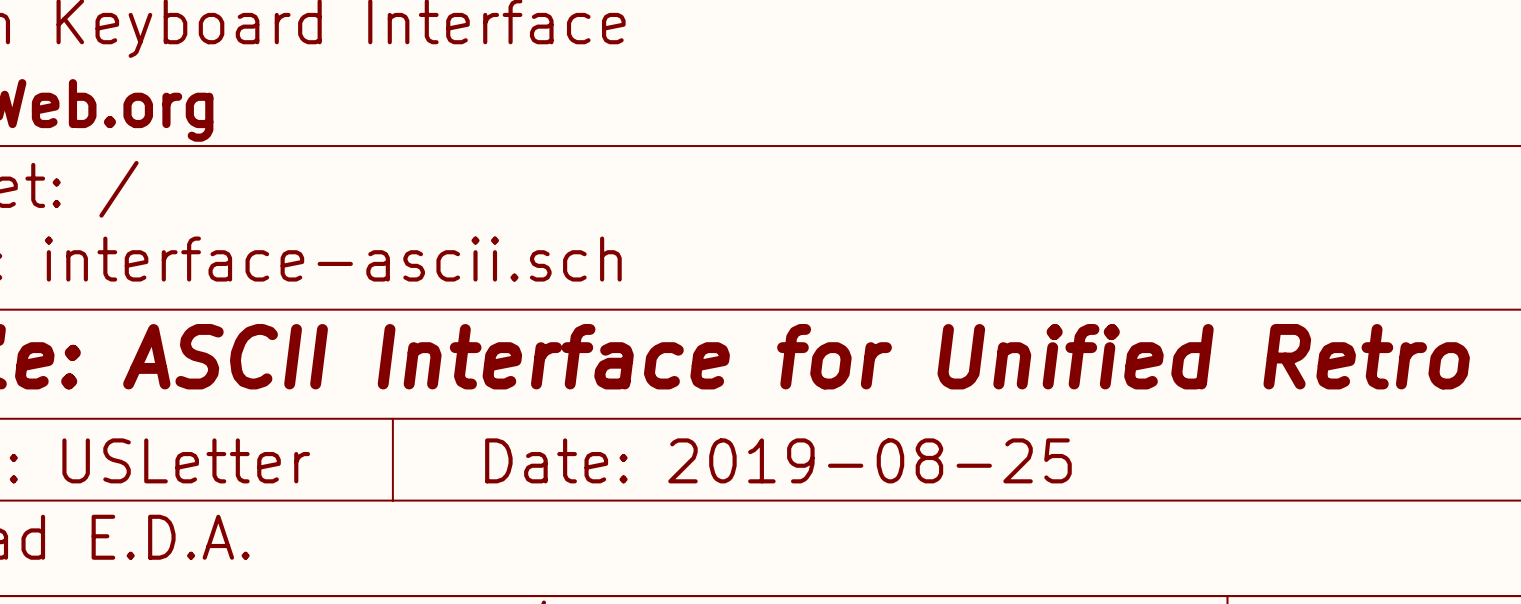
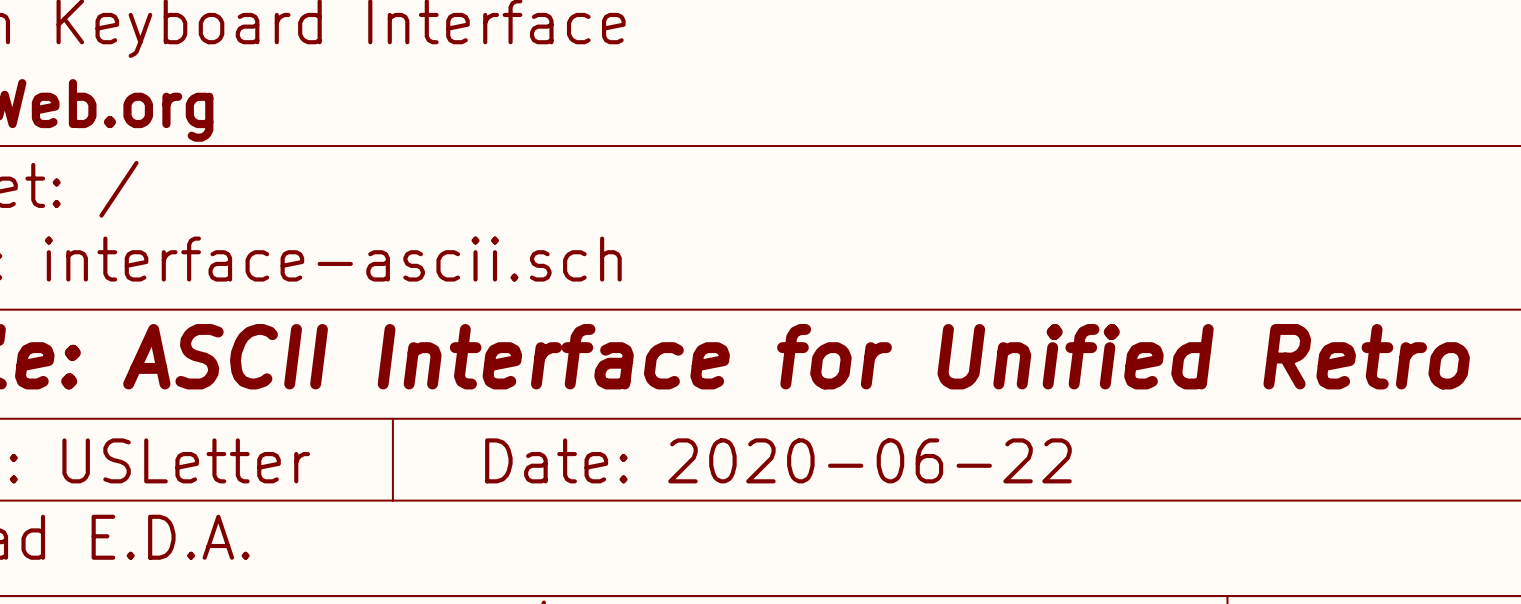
title block: Date: 2019-08-25 (778, 460) -> Date: 2020-06-22 (778, 460)

